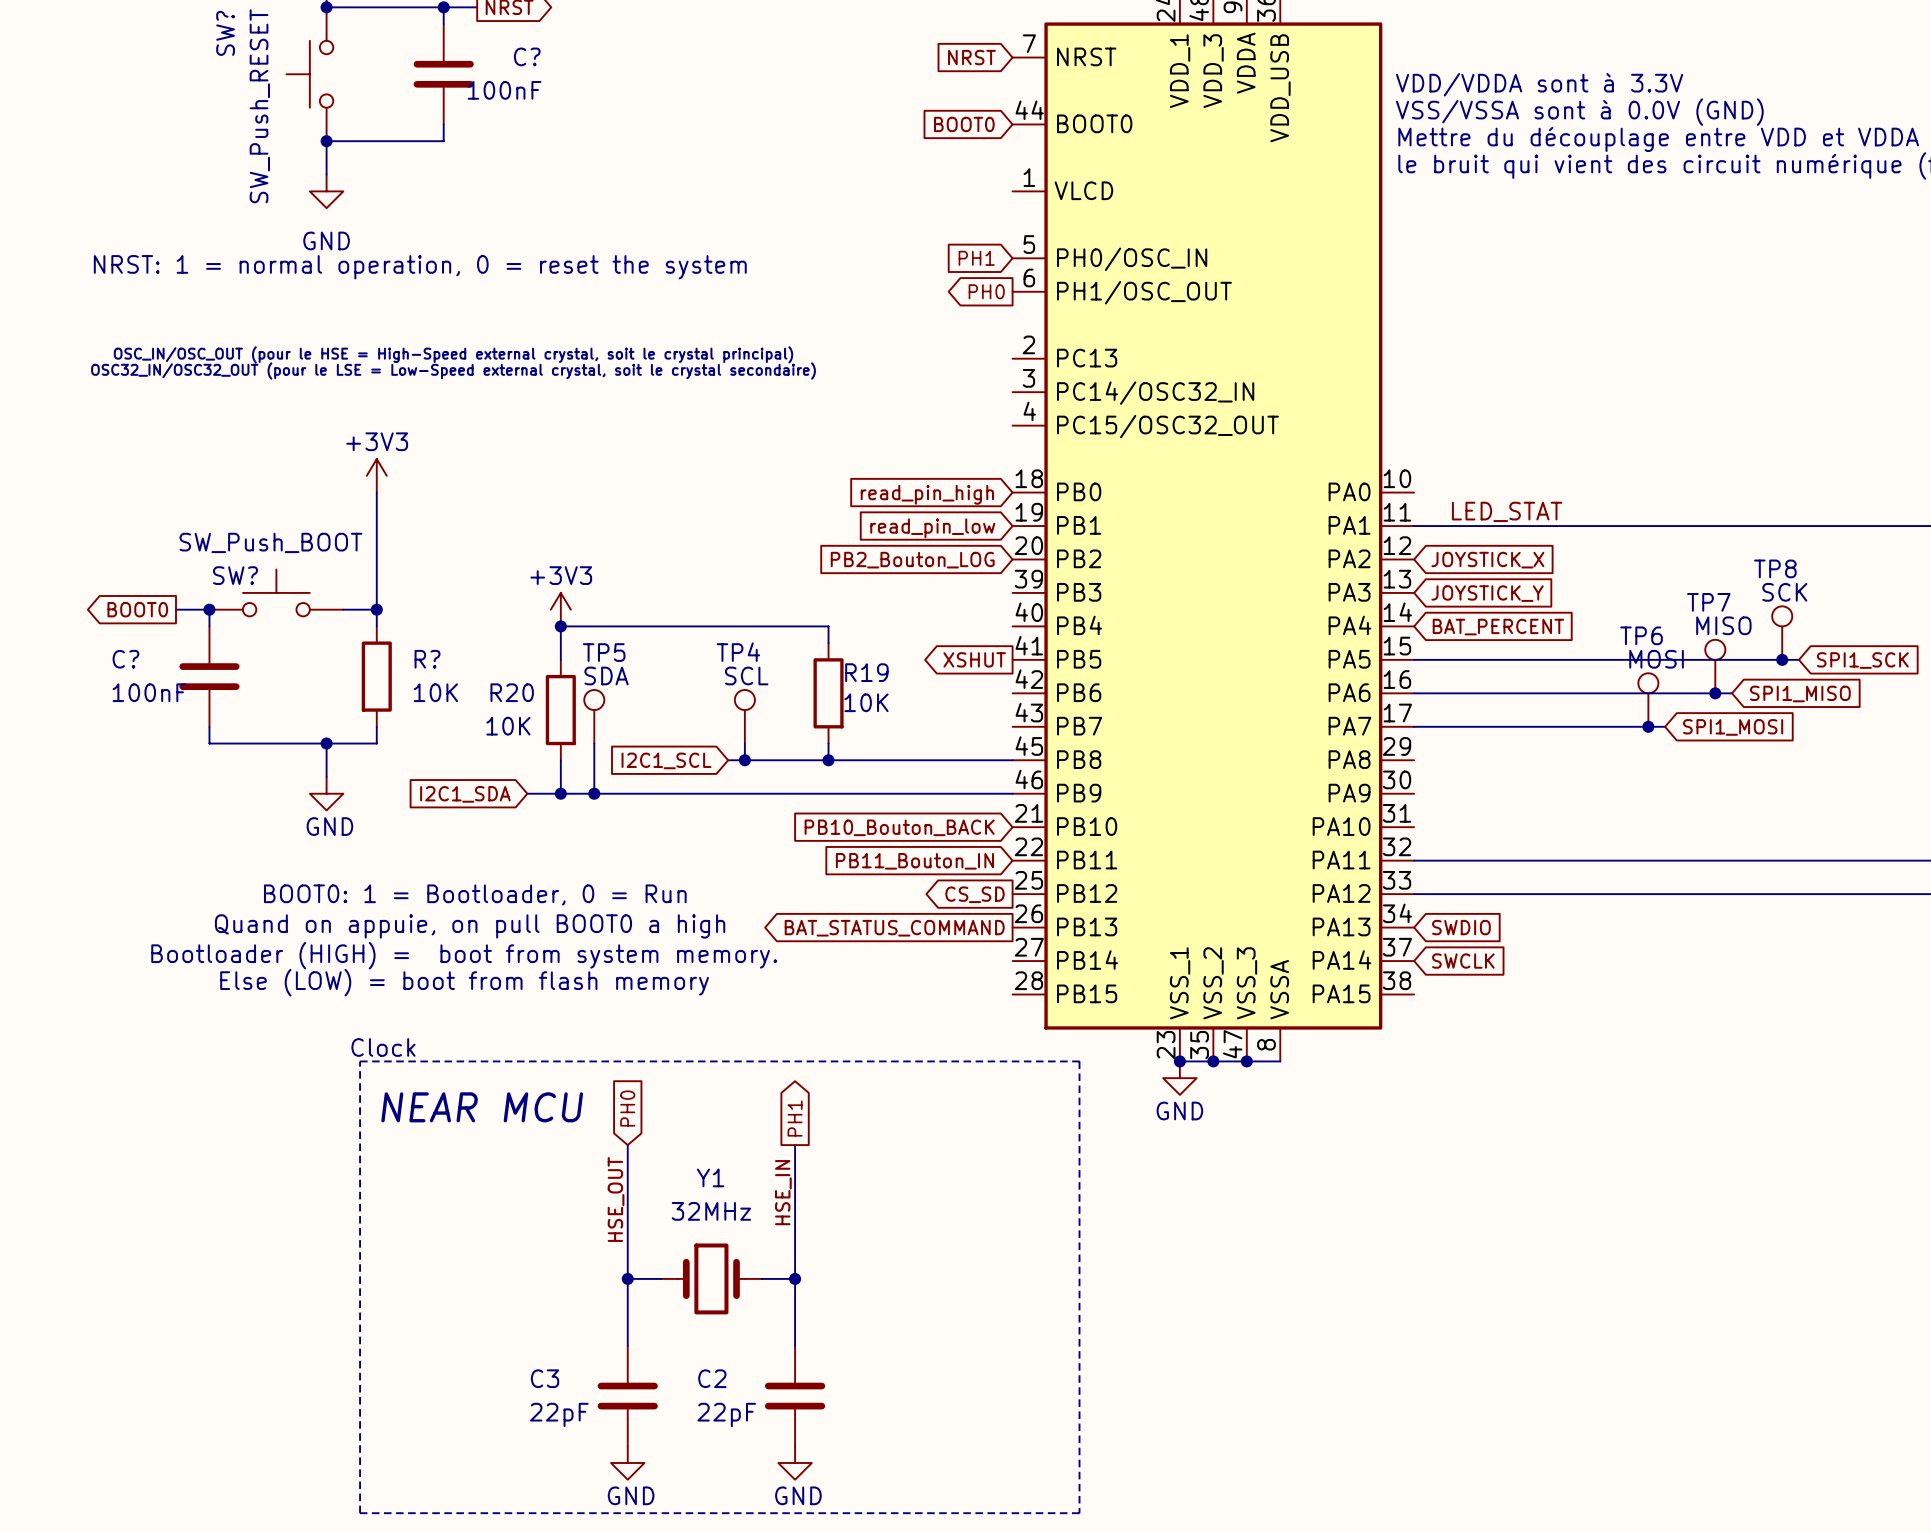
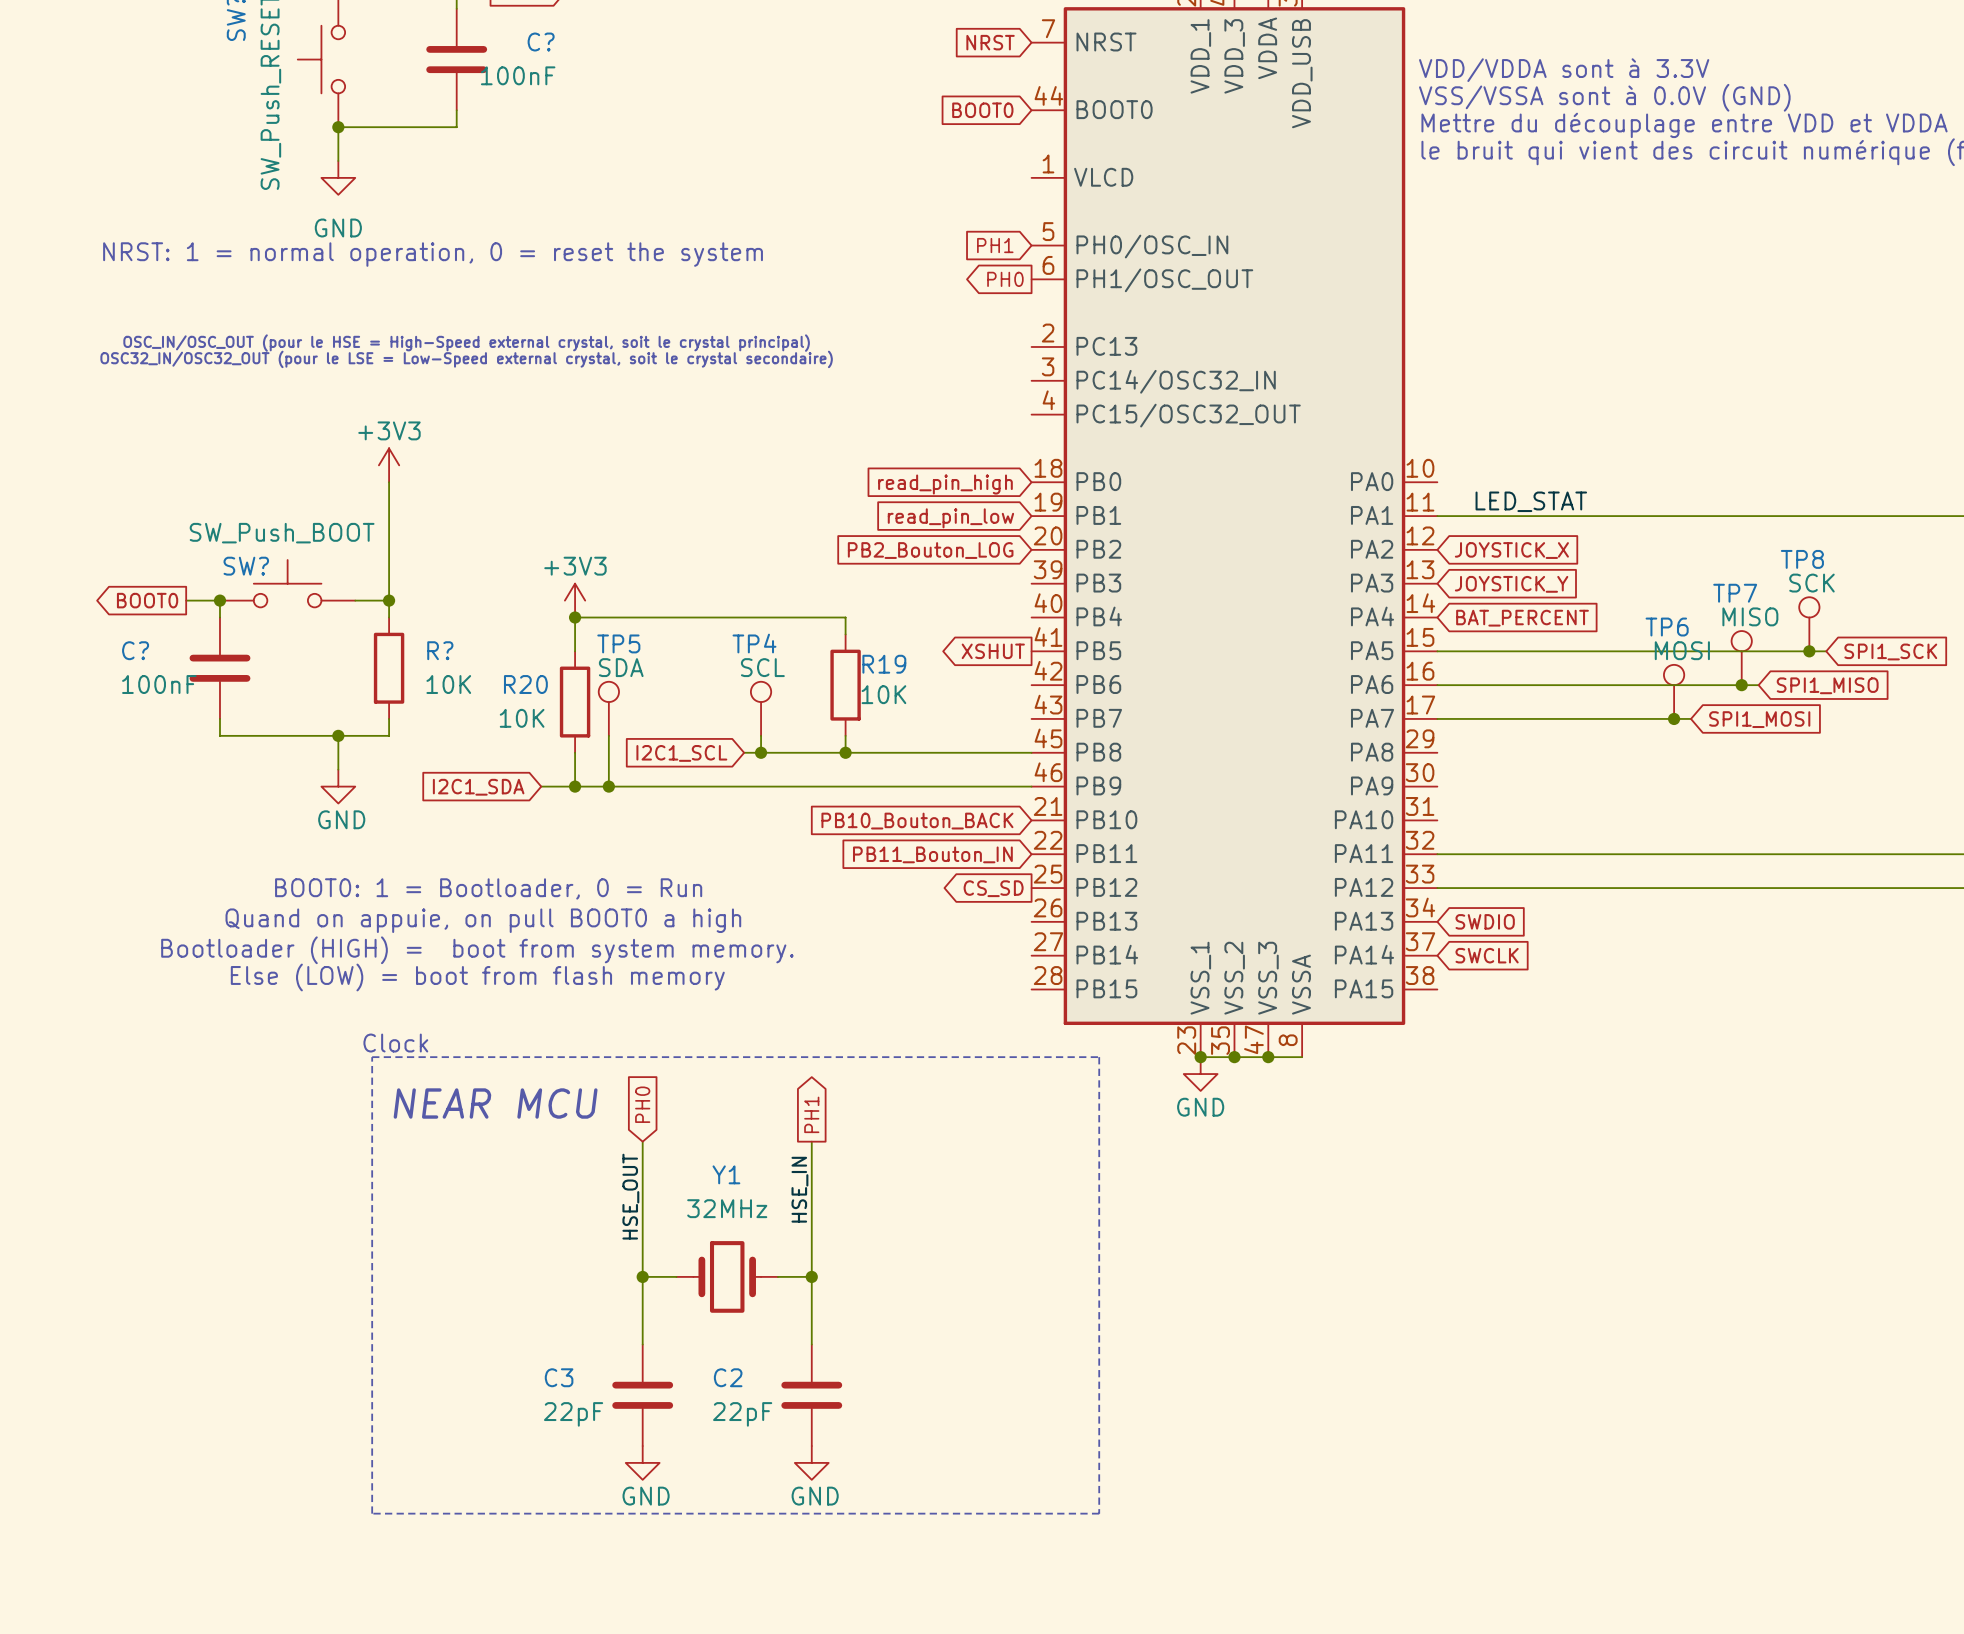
global label: BAT_STATUS_COMMAND (894, 928) -> none

